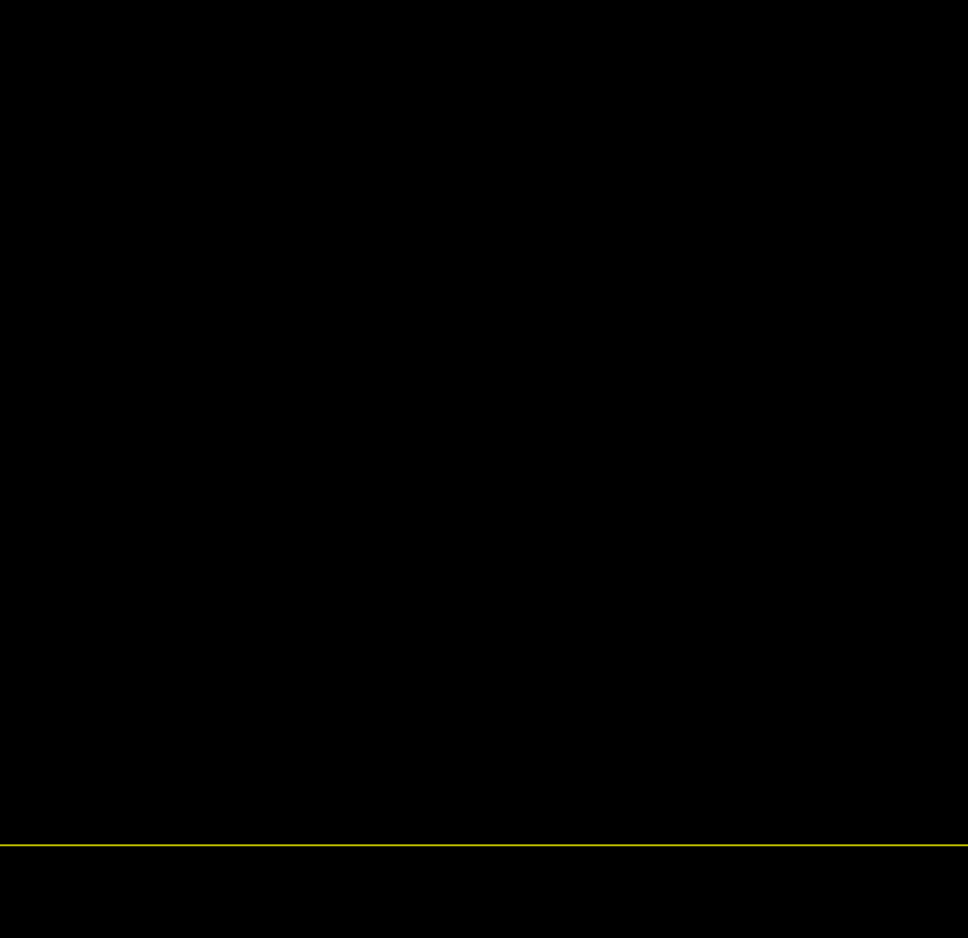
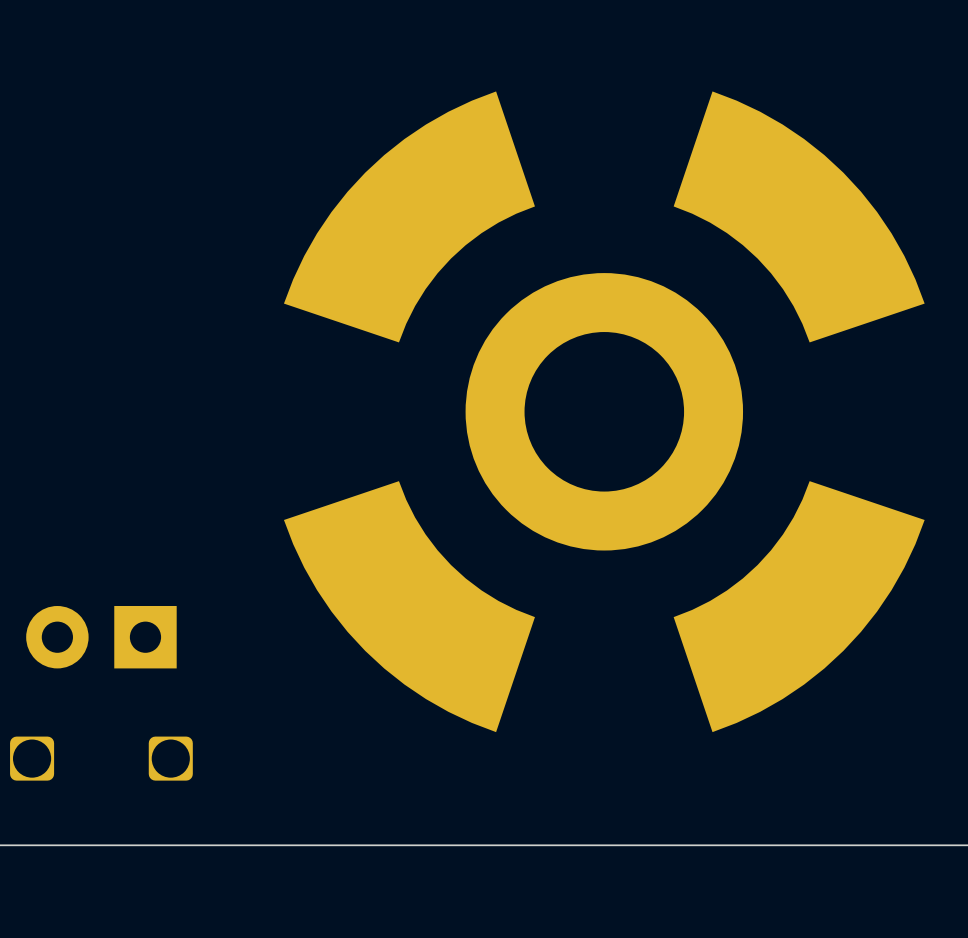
part: none -> (604, 411)
part: none -> (101, 693)

